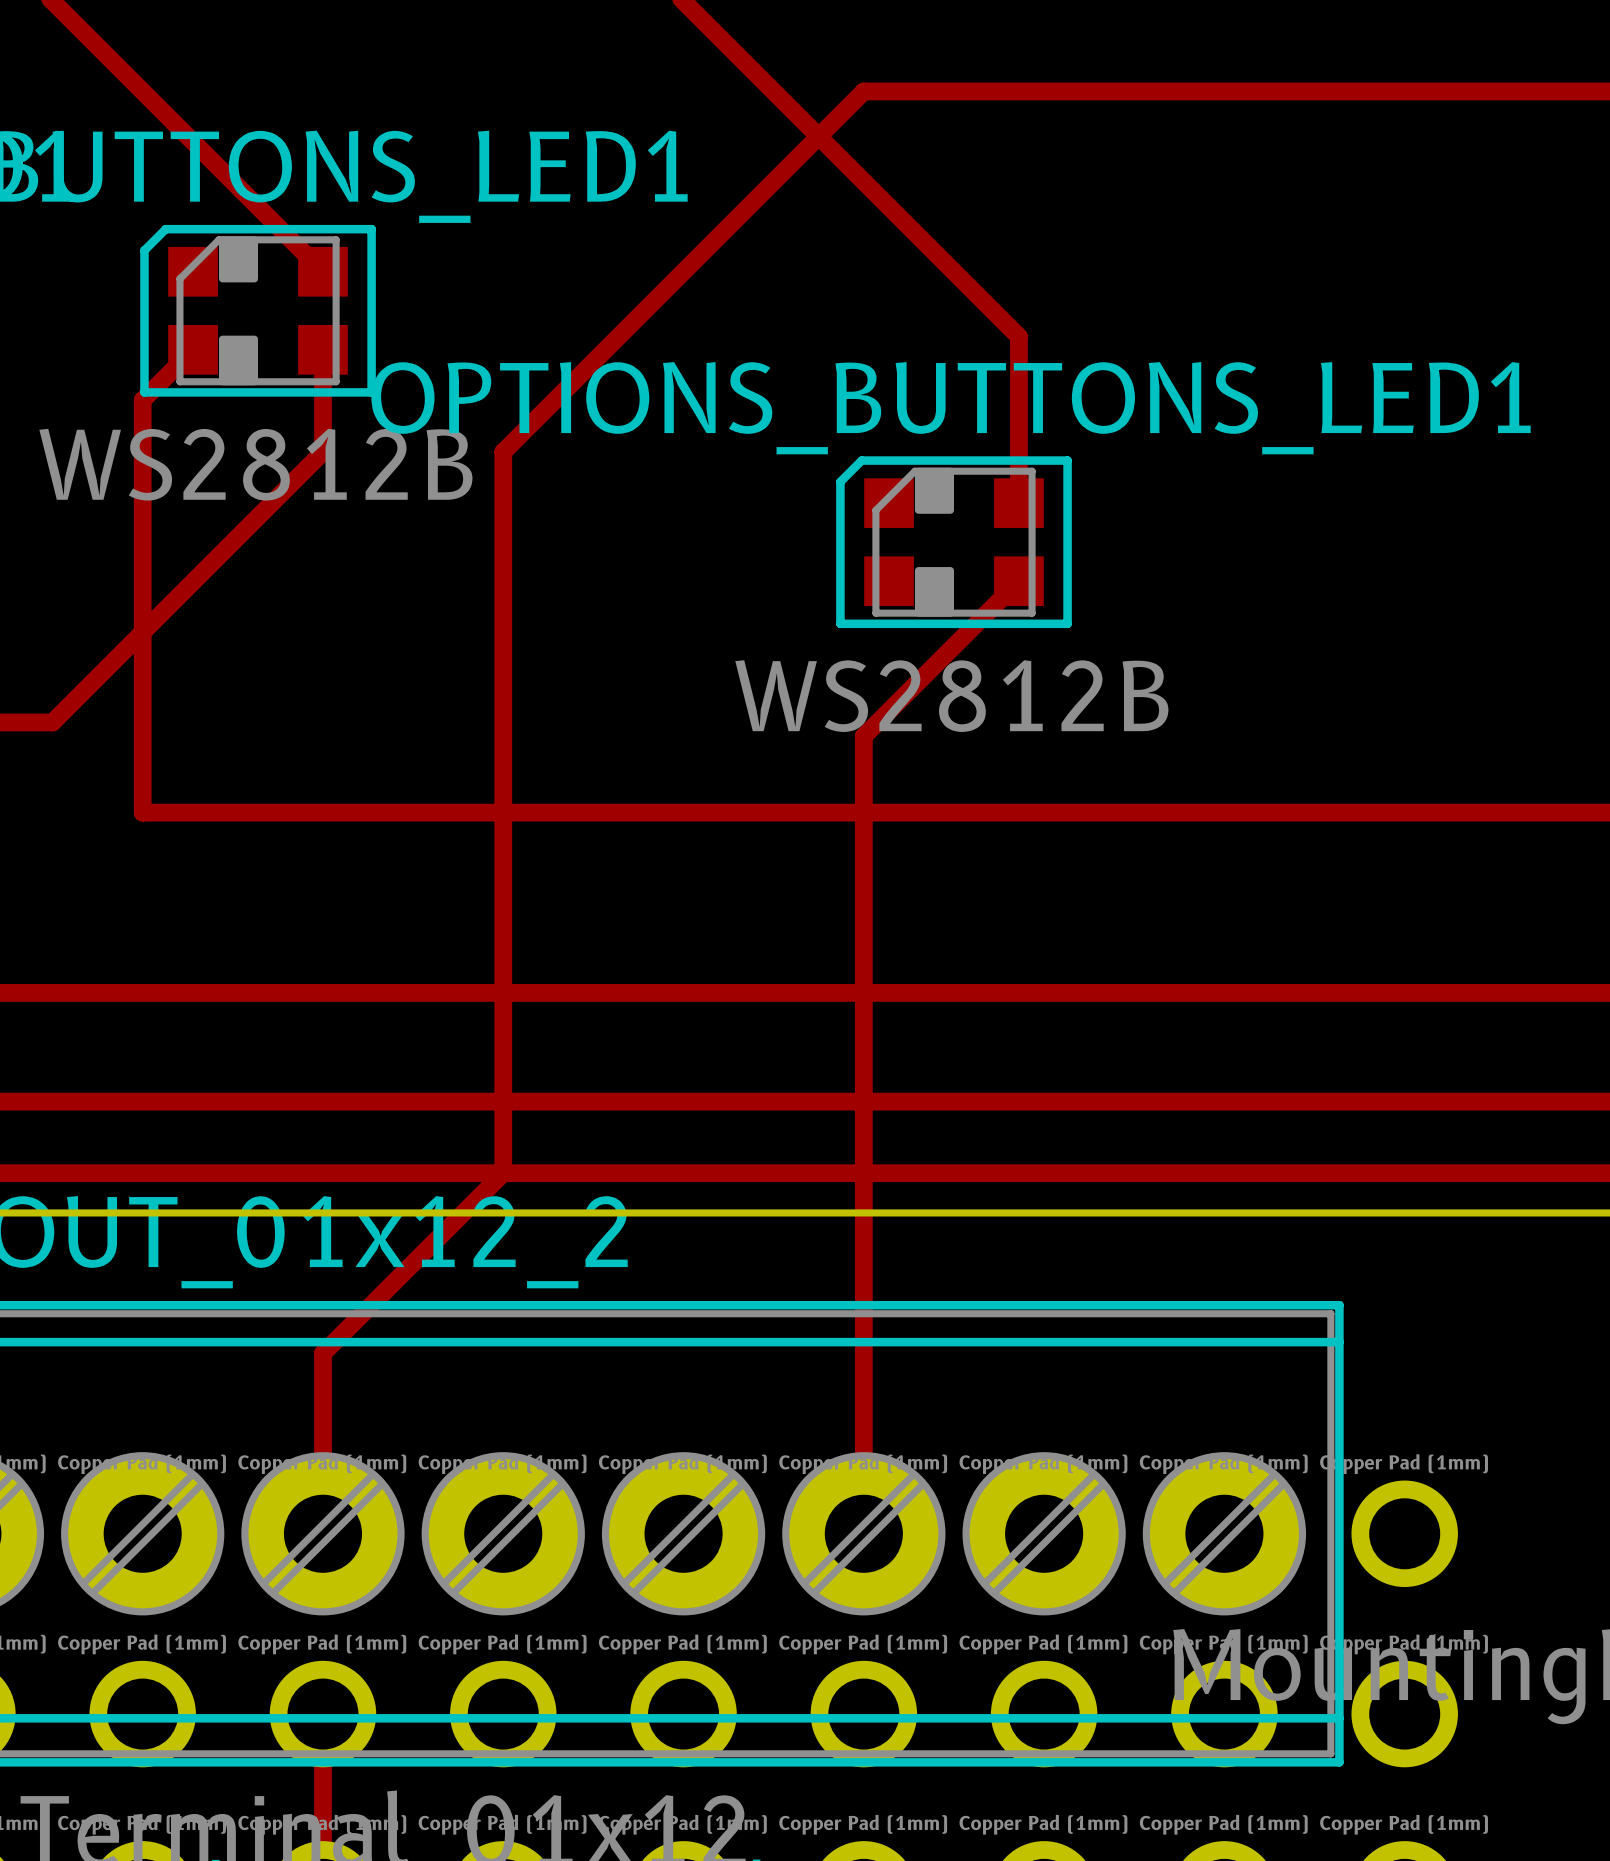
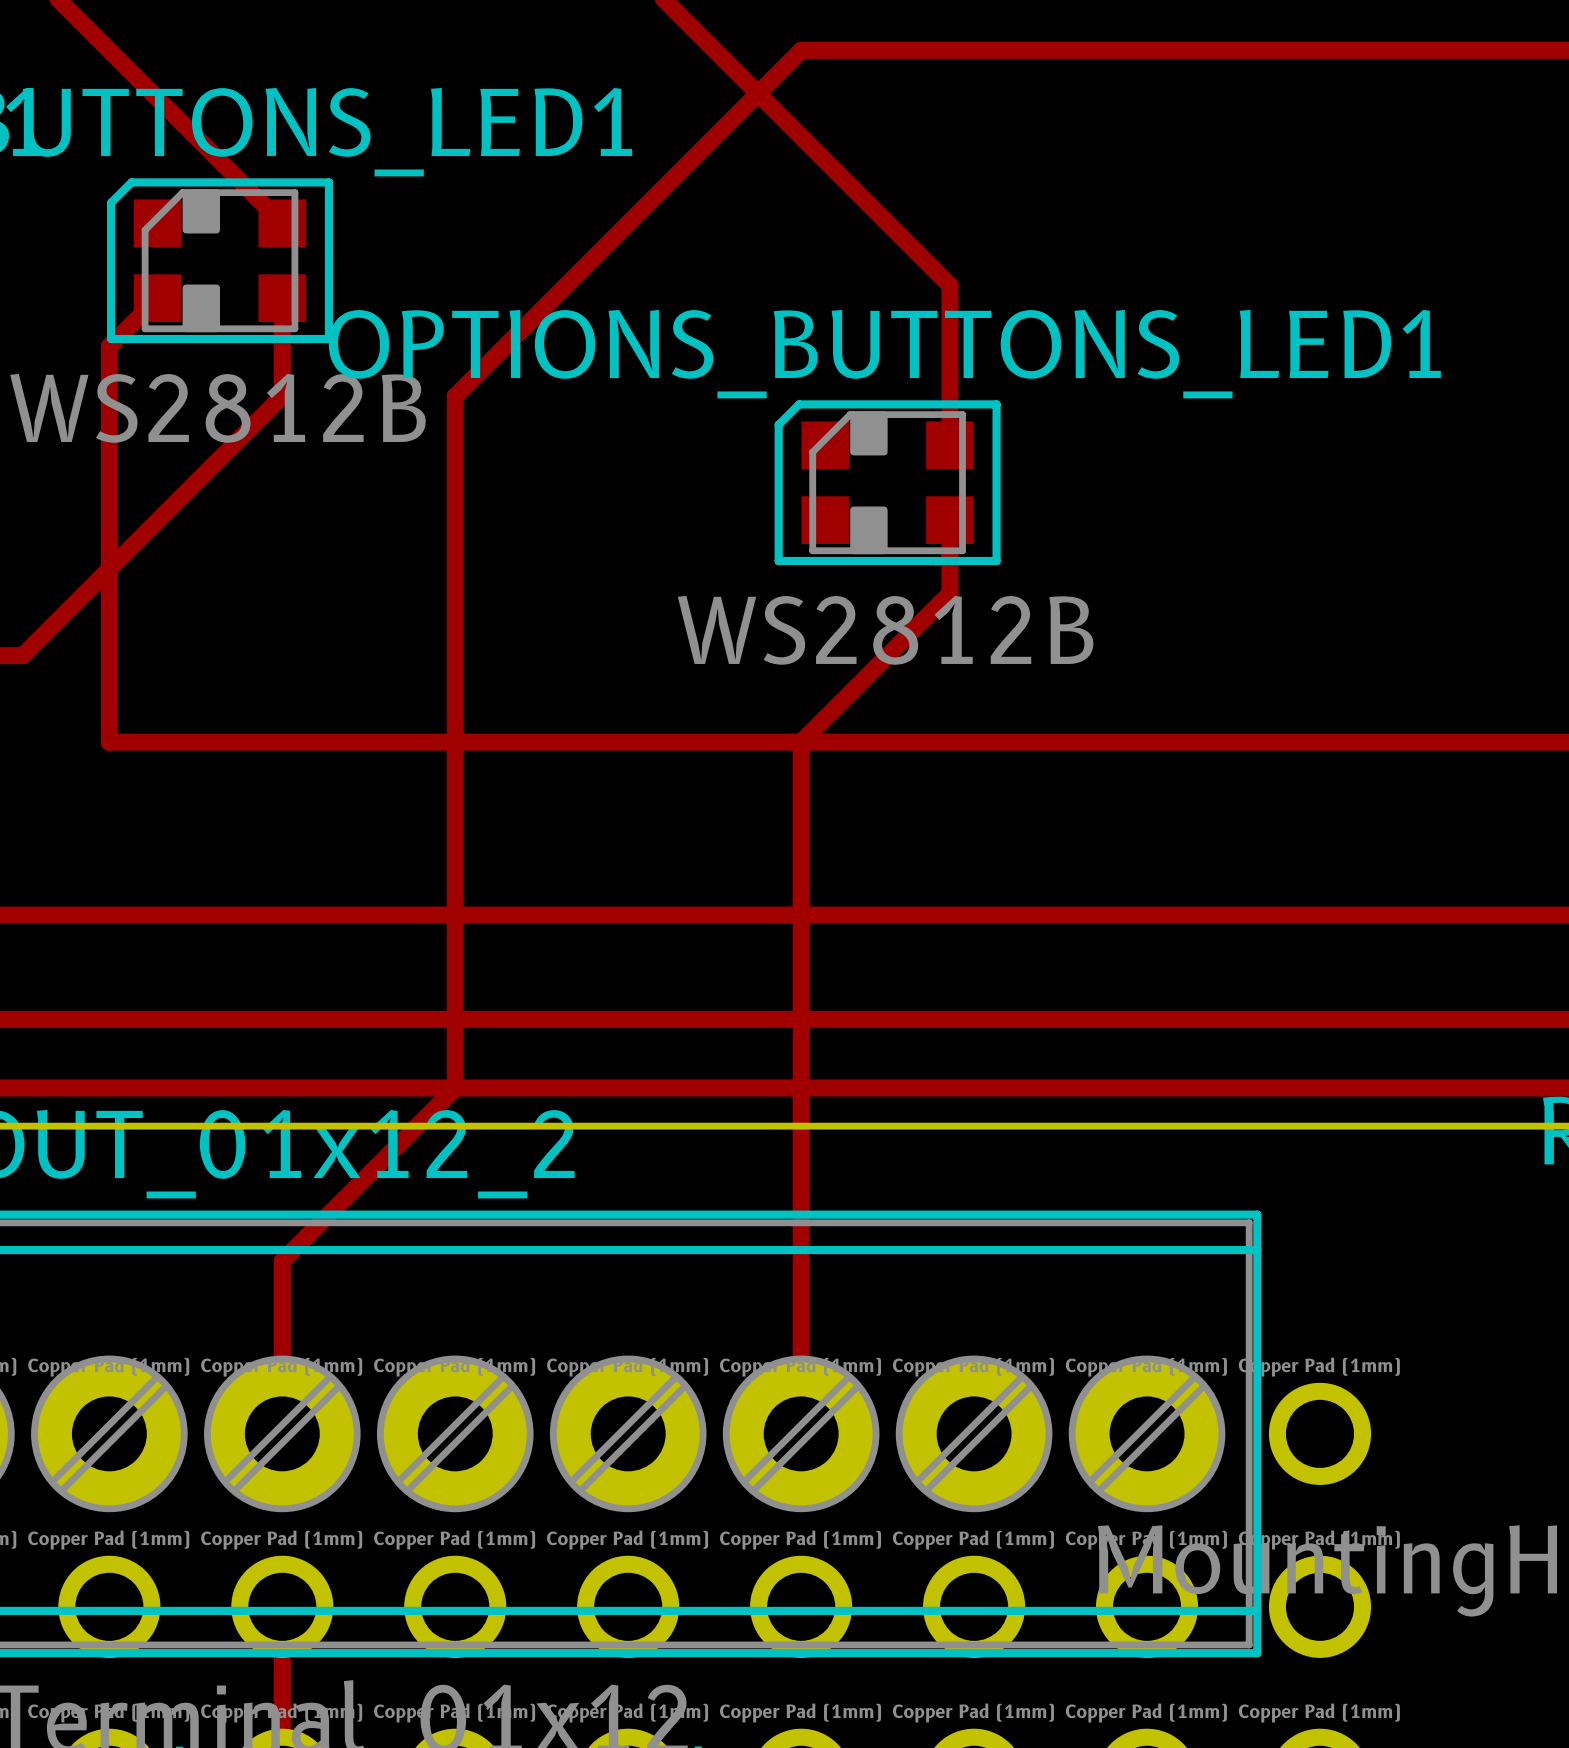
track: (1018, 581) (863, 736) (863, 812) -> (949, 520) (949, 593) (801, 742)

